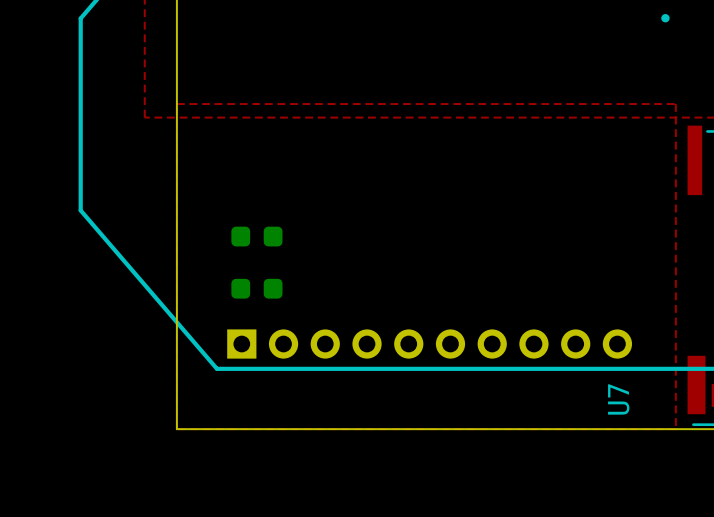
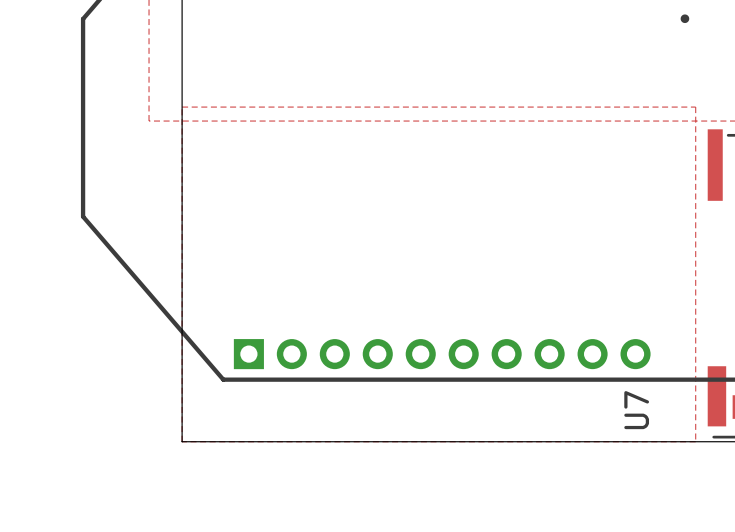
part: (256, 236) -> none
part: (256, 288) -> none

